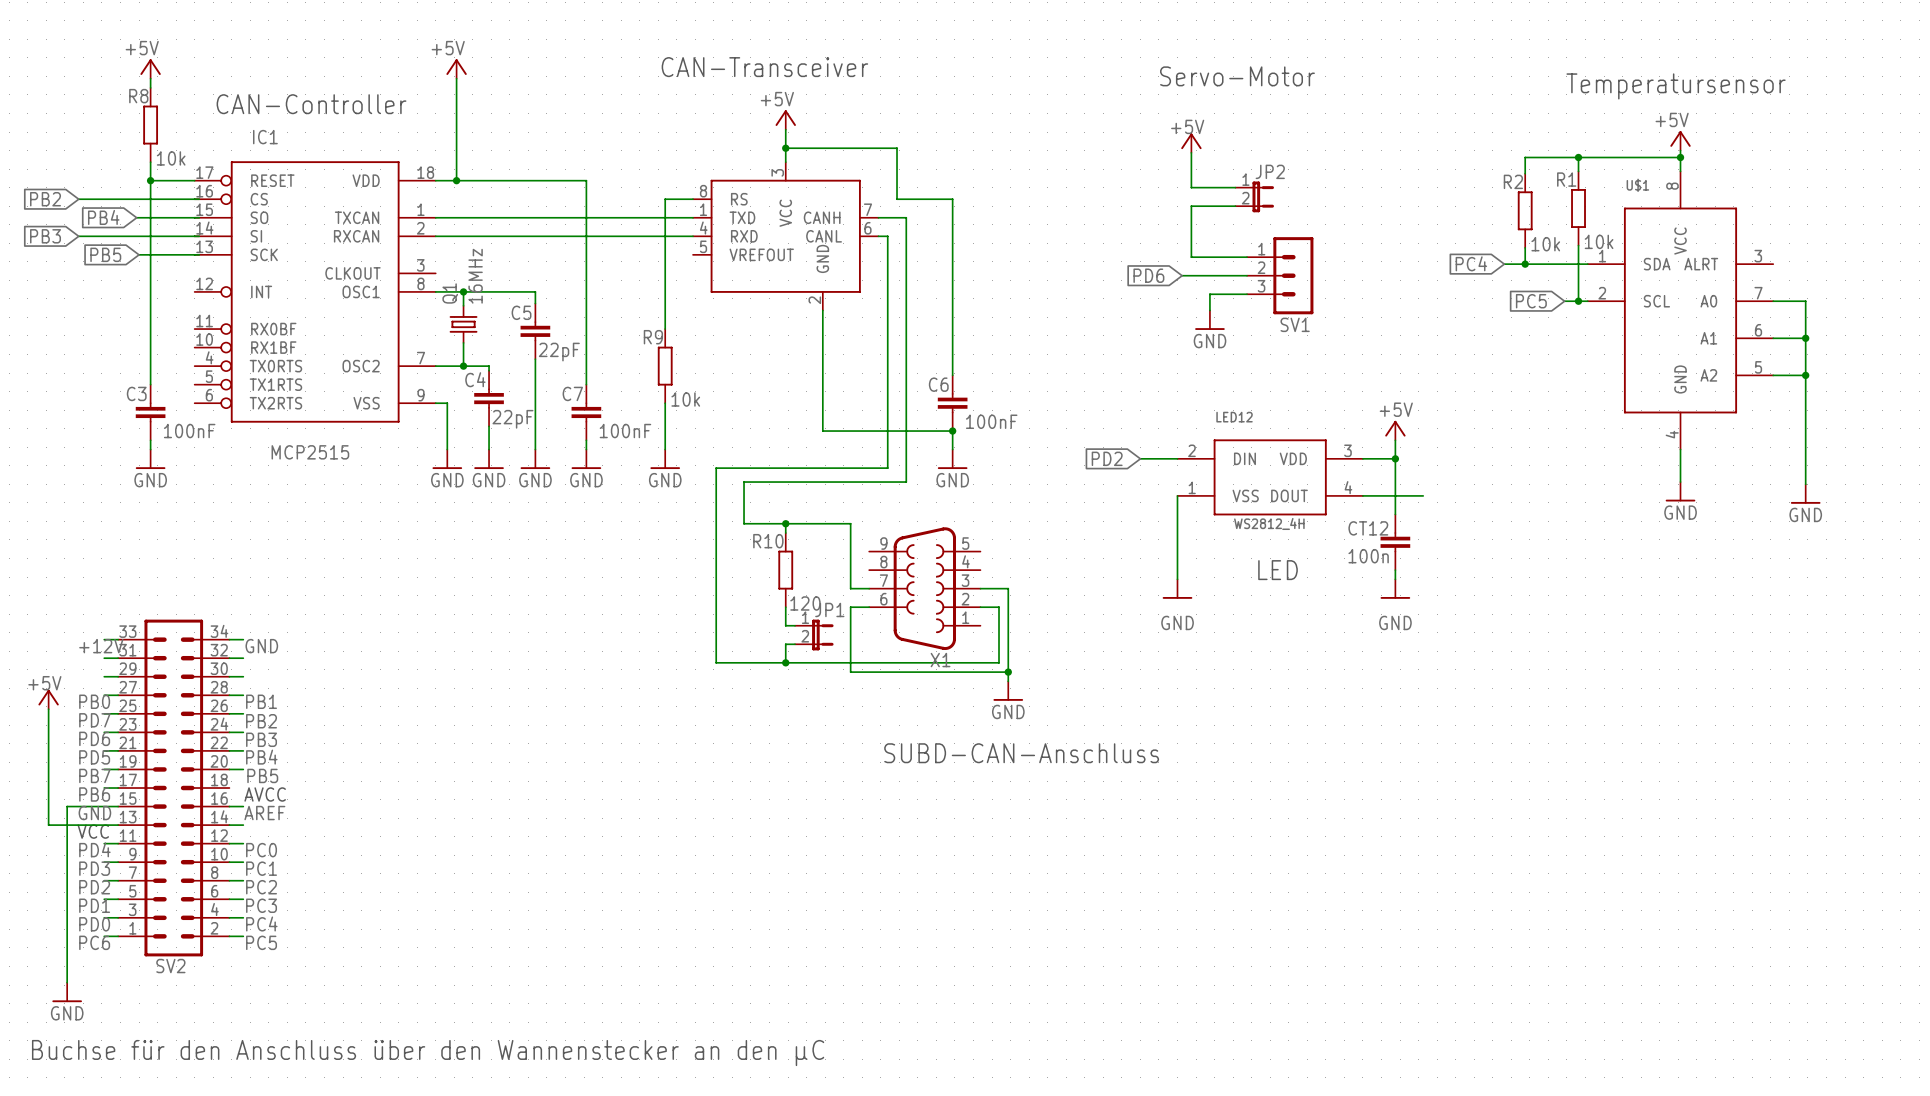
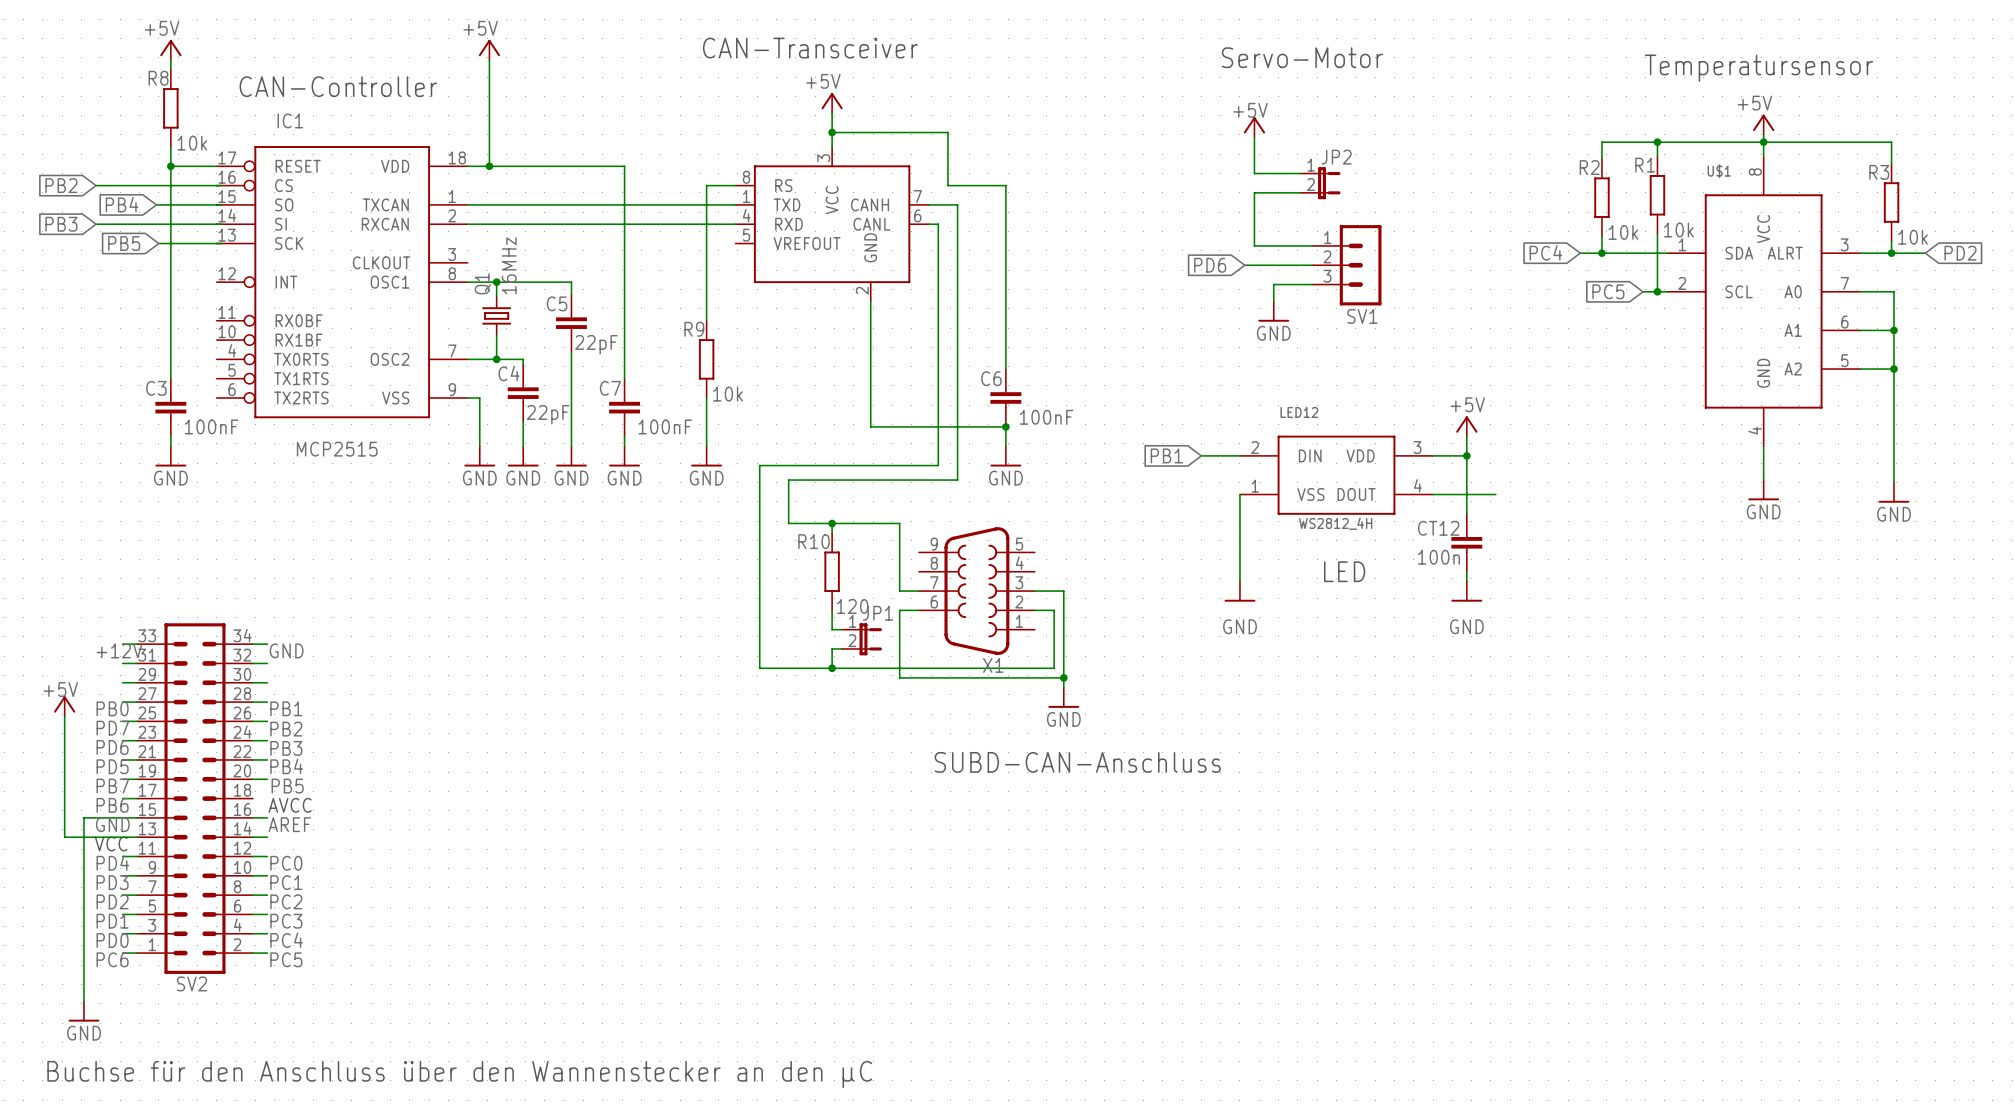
wire: none -> (1763, 142) (1891, 142) (1891, 163)
R3: none -> 10k (1891, 202)
wire: none -> (1891, 241) (1891, 253)
wire: none -> (1860, 253) (1925, 253)
junction: none -> (1891, 253)
global label: none -> PD2 (1960, 253)
global label: PD2 (1107, 458) -> PB1 (1166, 455)

